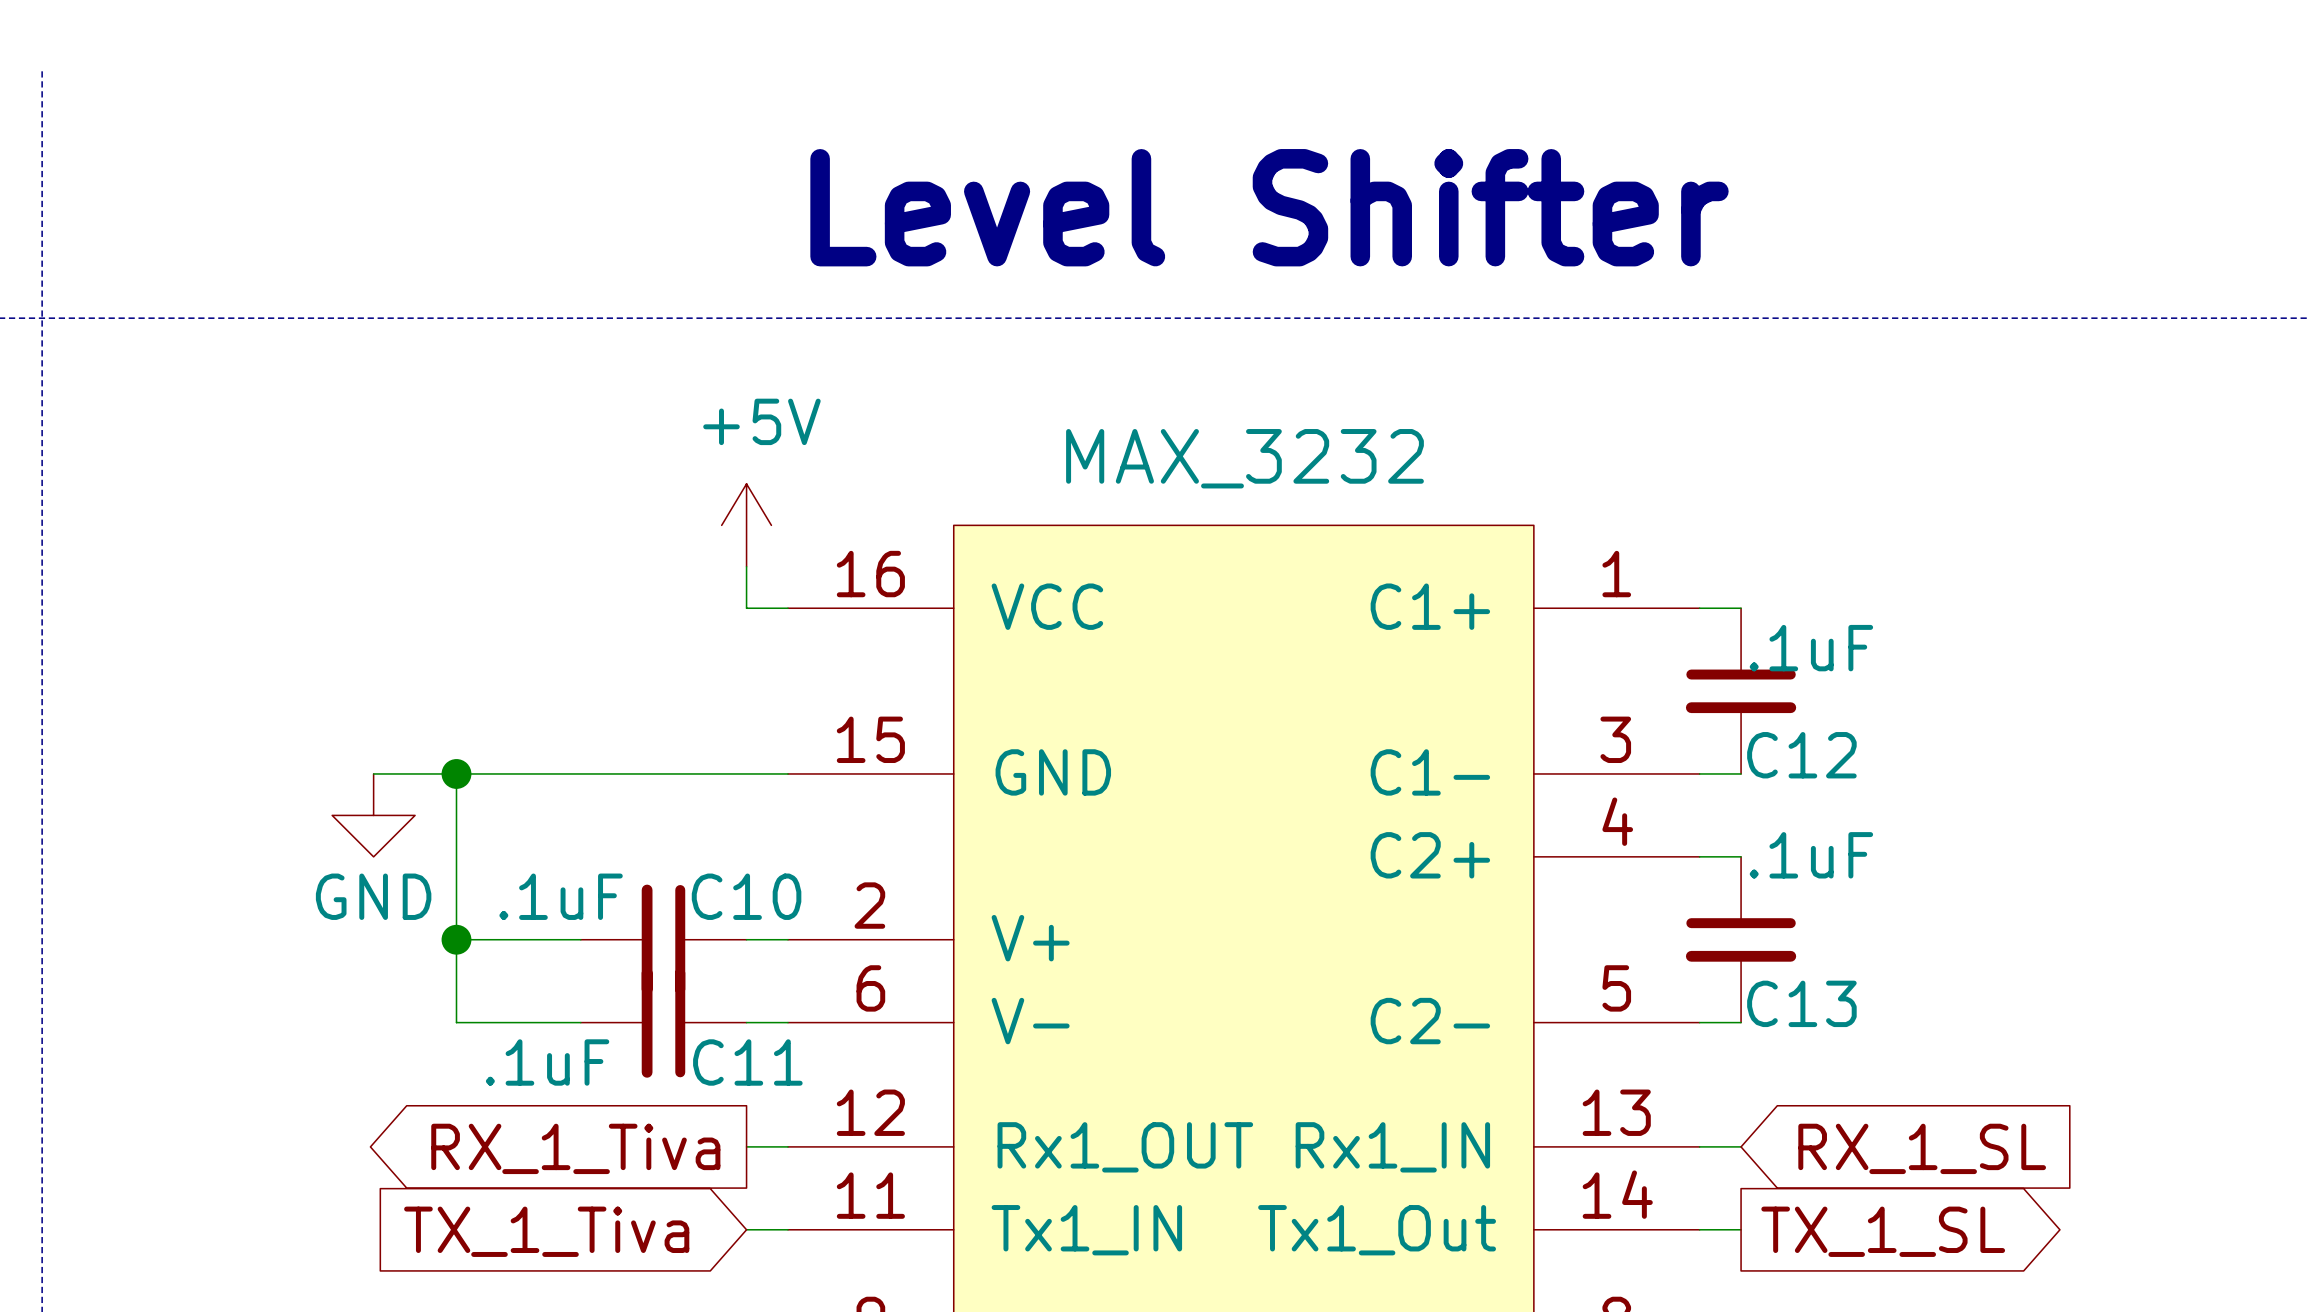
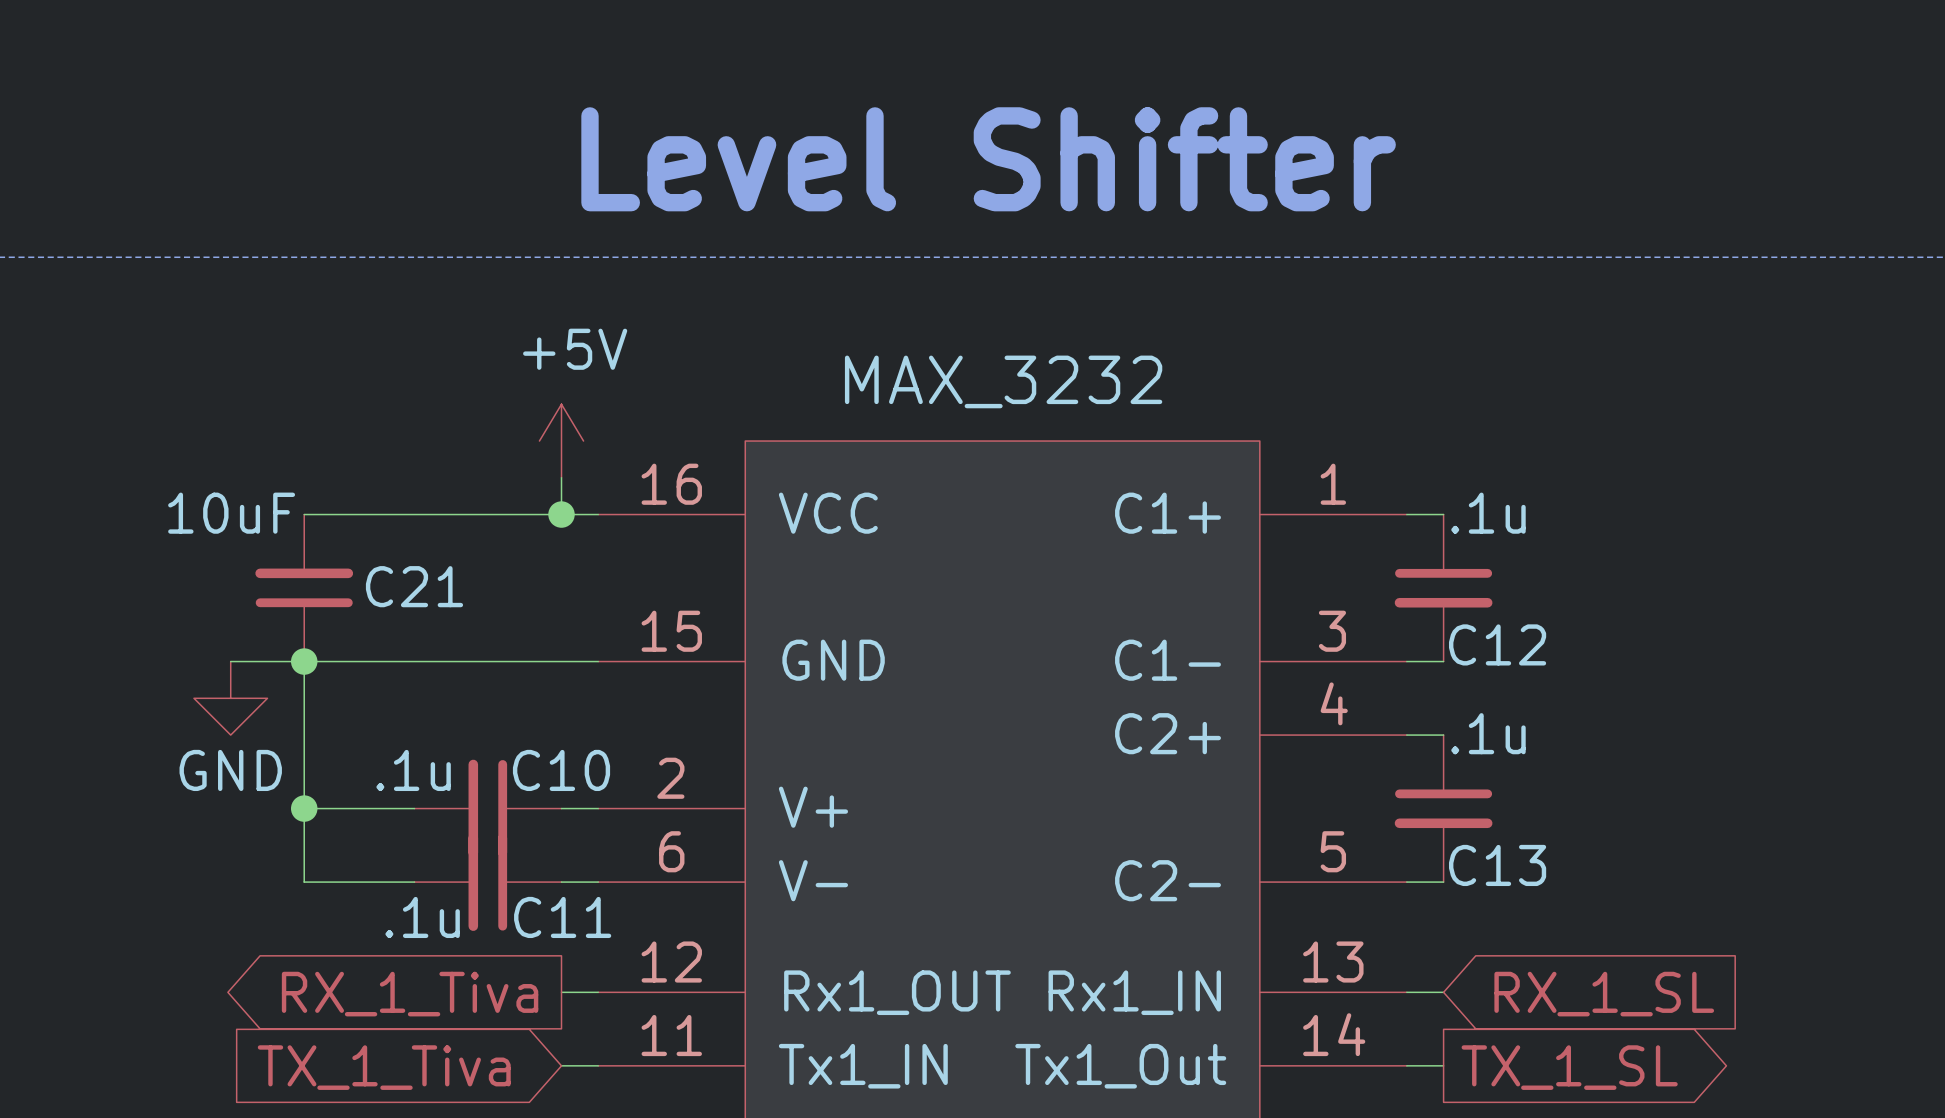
text position: Level Shifter (1269, 207) -> Level Shifter (988, 159)
wire: none -> (304, 514) (561, 514)
junction: none -> (561, 514)
C12 value: .1uF (1811, 648) -> .1u (1488, 513)
C21: none -> 10uF (304, 588)
C13 value: .1uF (1811, 855) -> .1u (1488, 733)
C10 value: .1uF (561, 896) -> .1u (413, 770)
C11 value: .1uF (547, 1062) -> .1u (422, 917)

